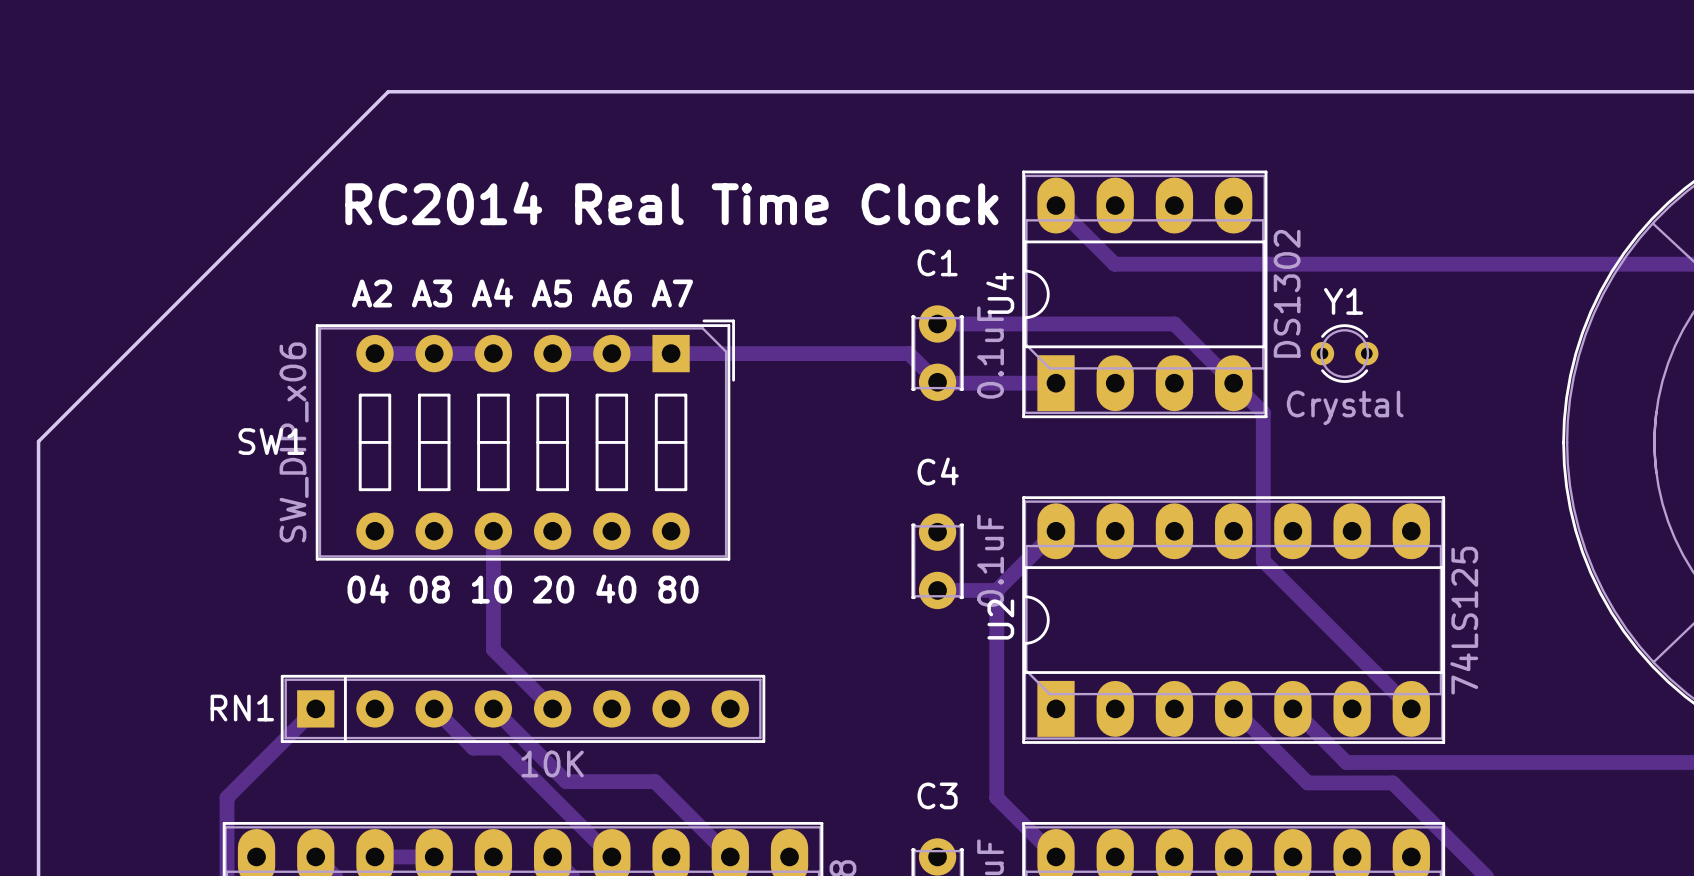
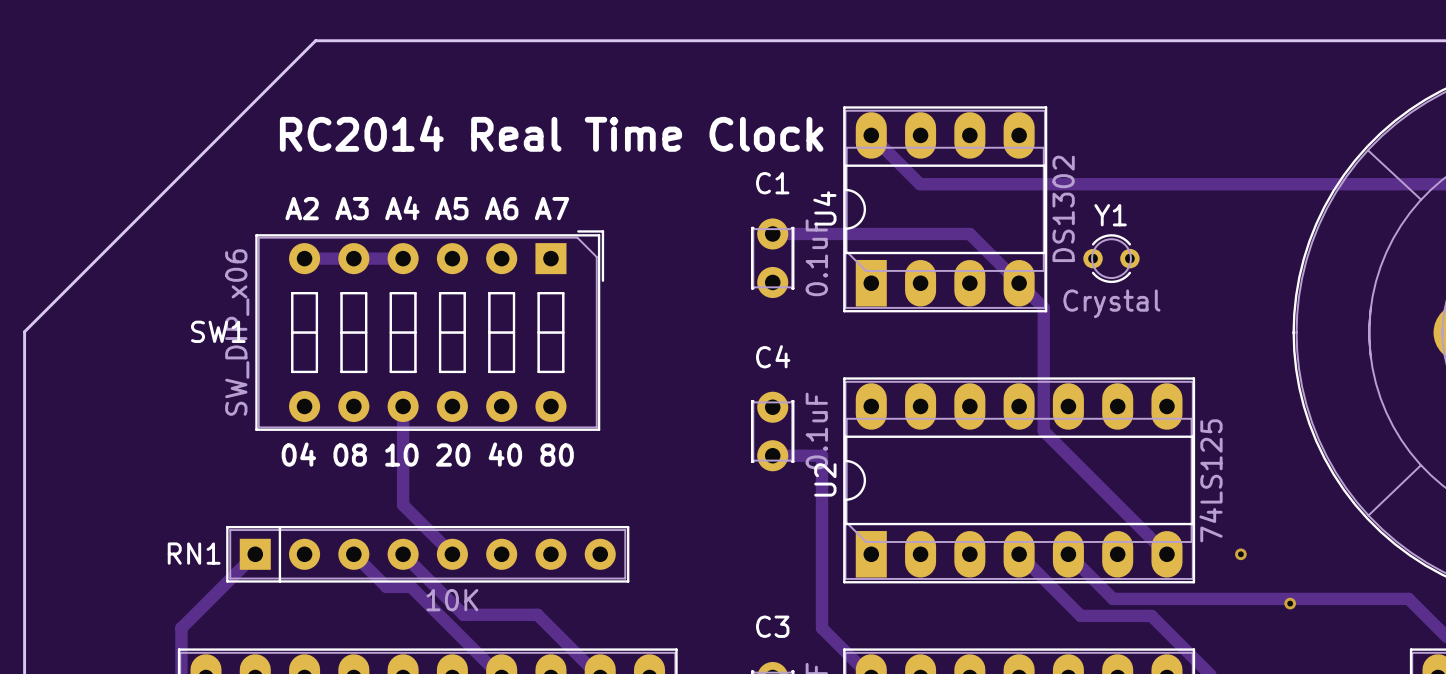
track: (552, 353) (908, 353) (938, 383) (1056, 383) -> none
track: (1056, 531) (996, 590) -> none
via: none -> (1240, 554)
via: none -> (1290, 603)

